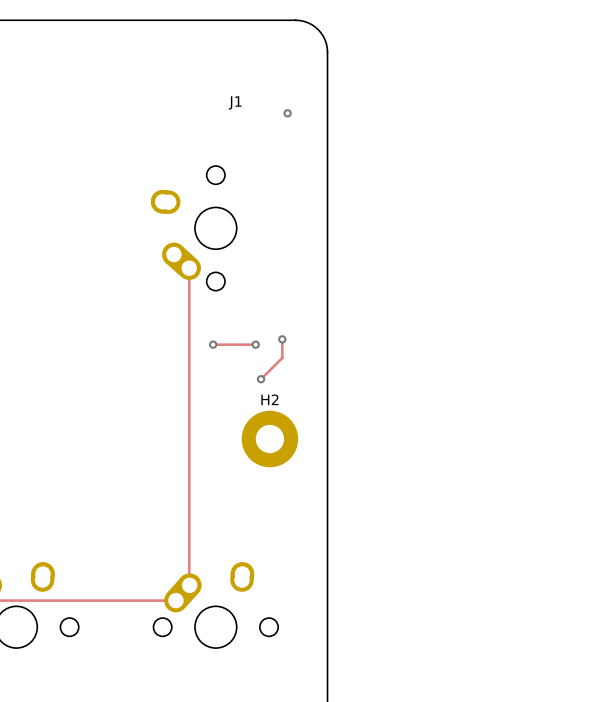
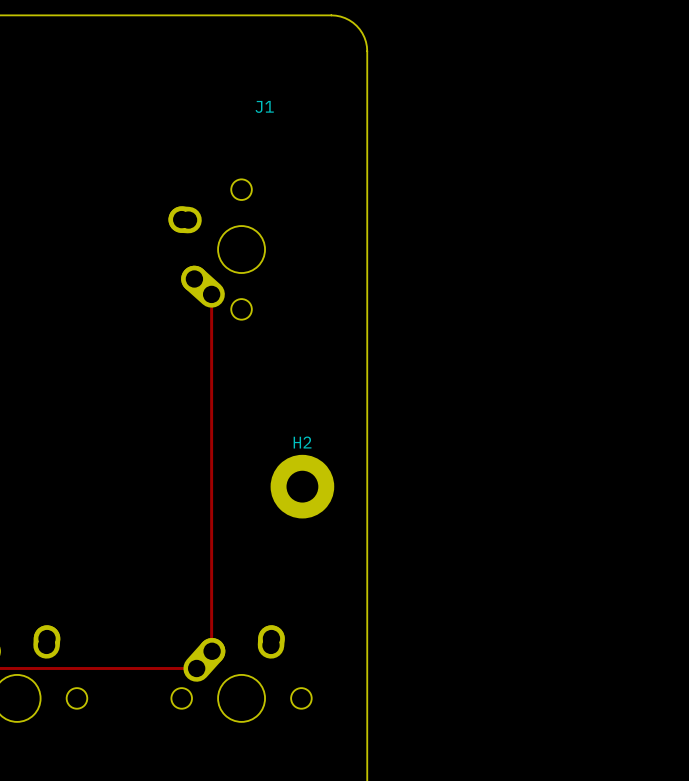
via: (287, 113) -> none
track: (282, 339) (282, 357) (261, 379) -> none
via: (282, 339) -> none
track: (213, 344) (255, 344) -> none
via: (213, 344) -> none
via: (255, 344) -> none
via: (261, 379) -> none

